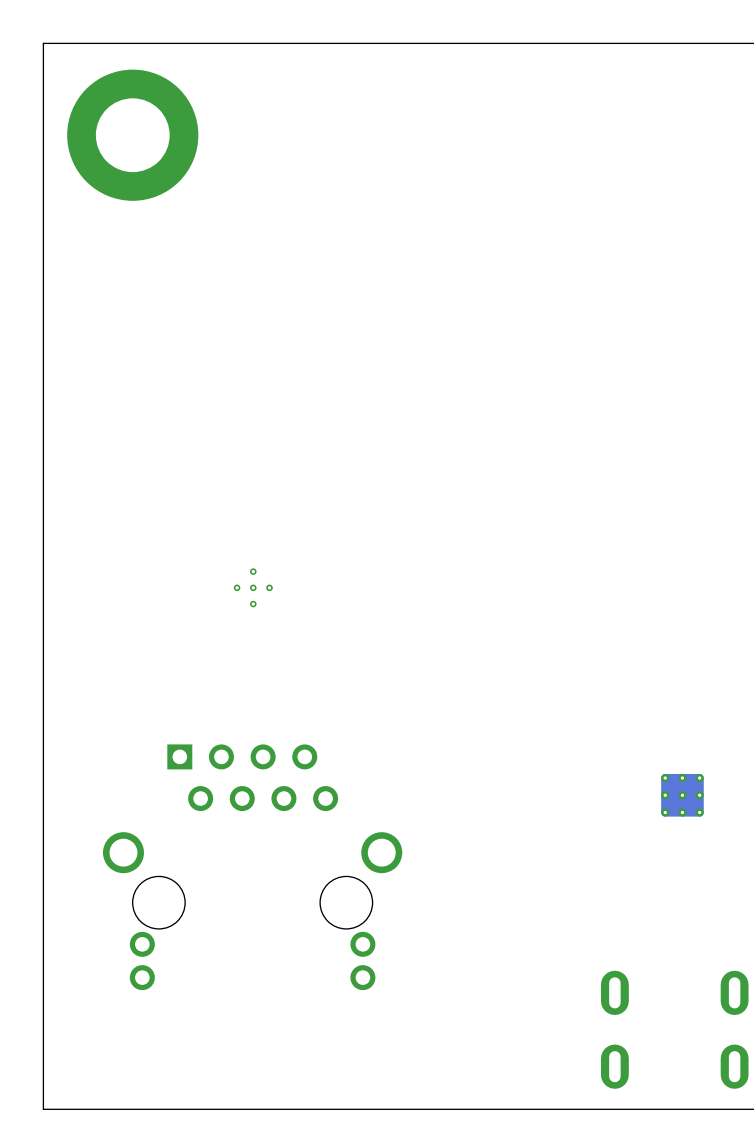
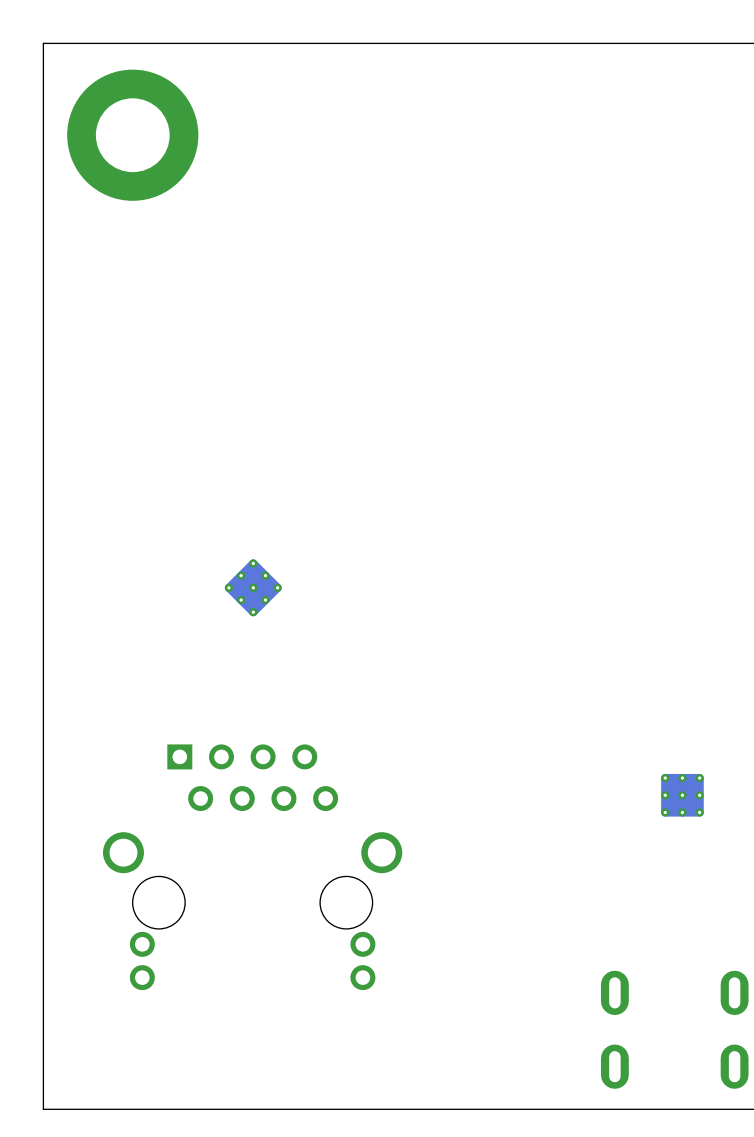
part footprint: [233, 568, 273, 608] -> [224, 559, 282, 617]

